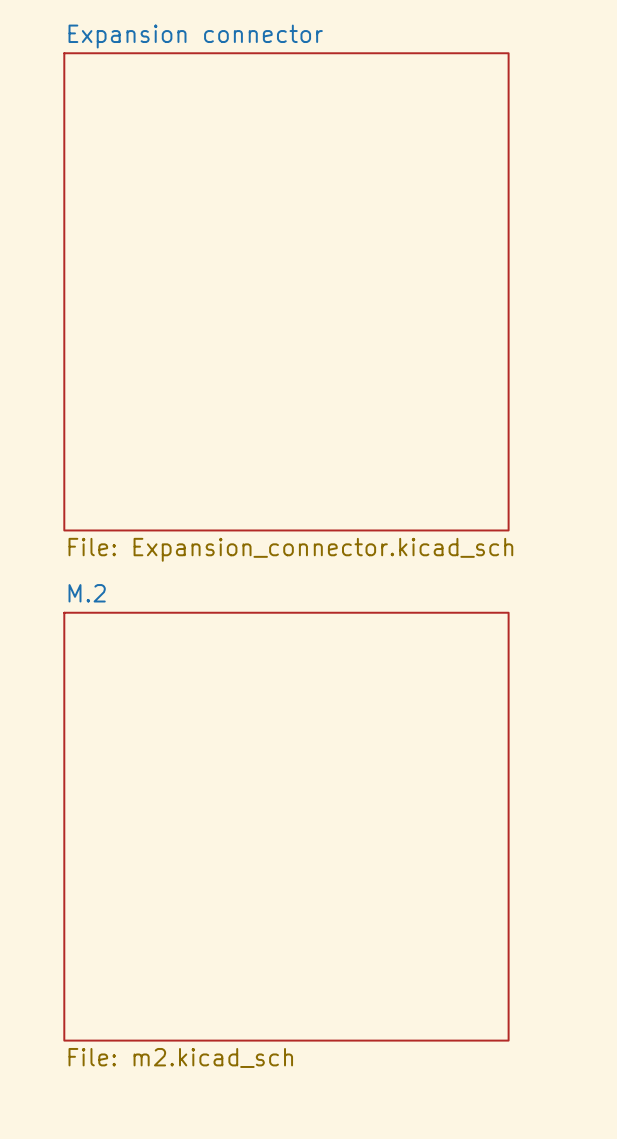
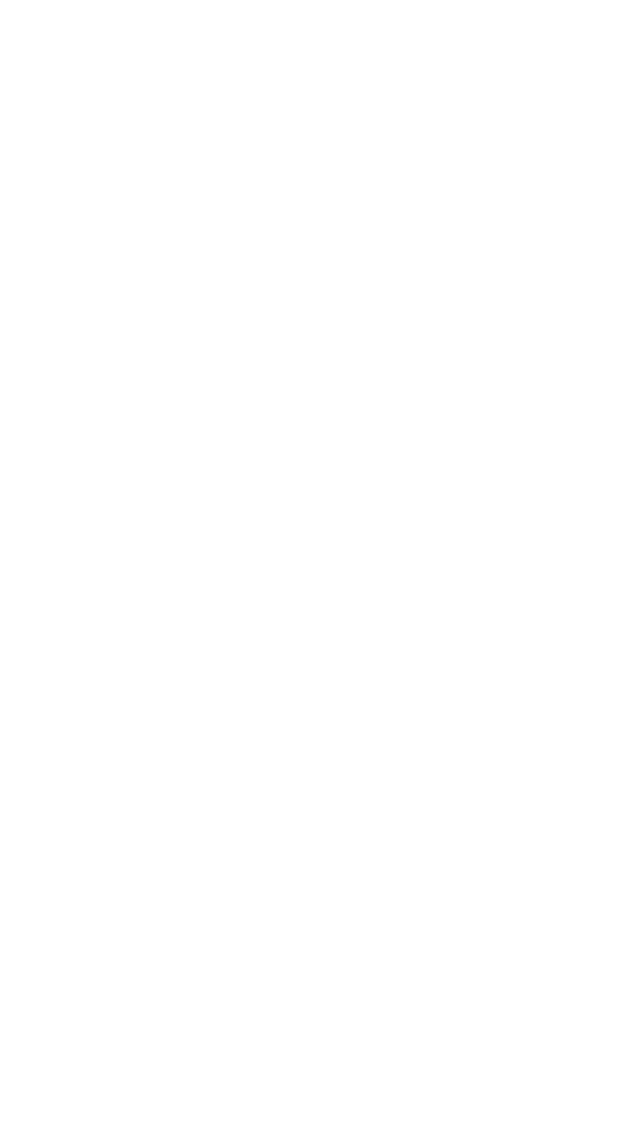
sheet Expansion connector: File: Expansion_connector.kicad_sch (286, 291) -> none
sheet M.2: File: m2.kicad_sch (286, 826) -> none

